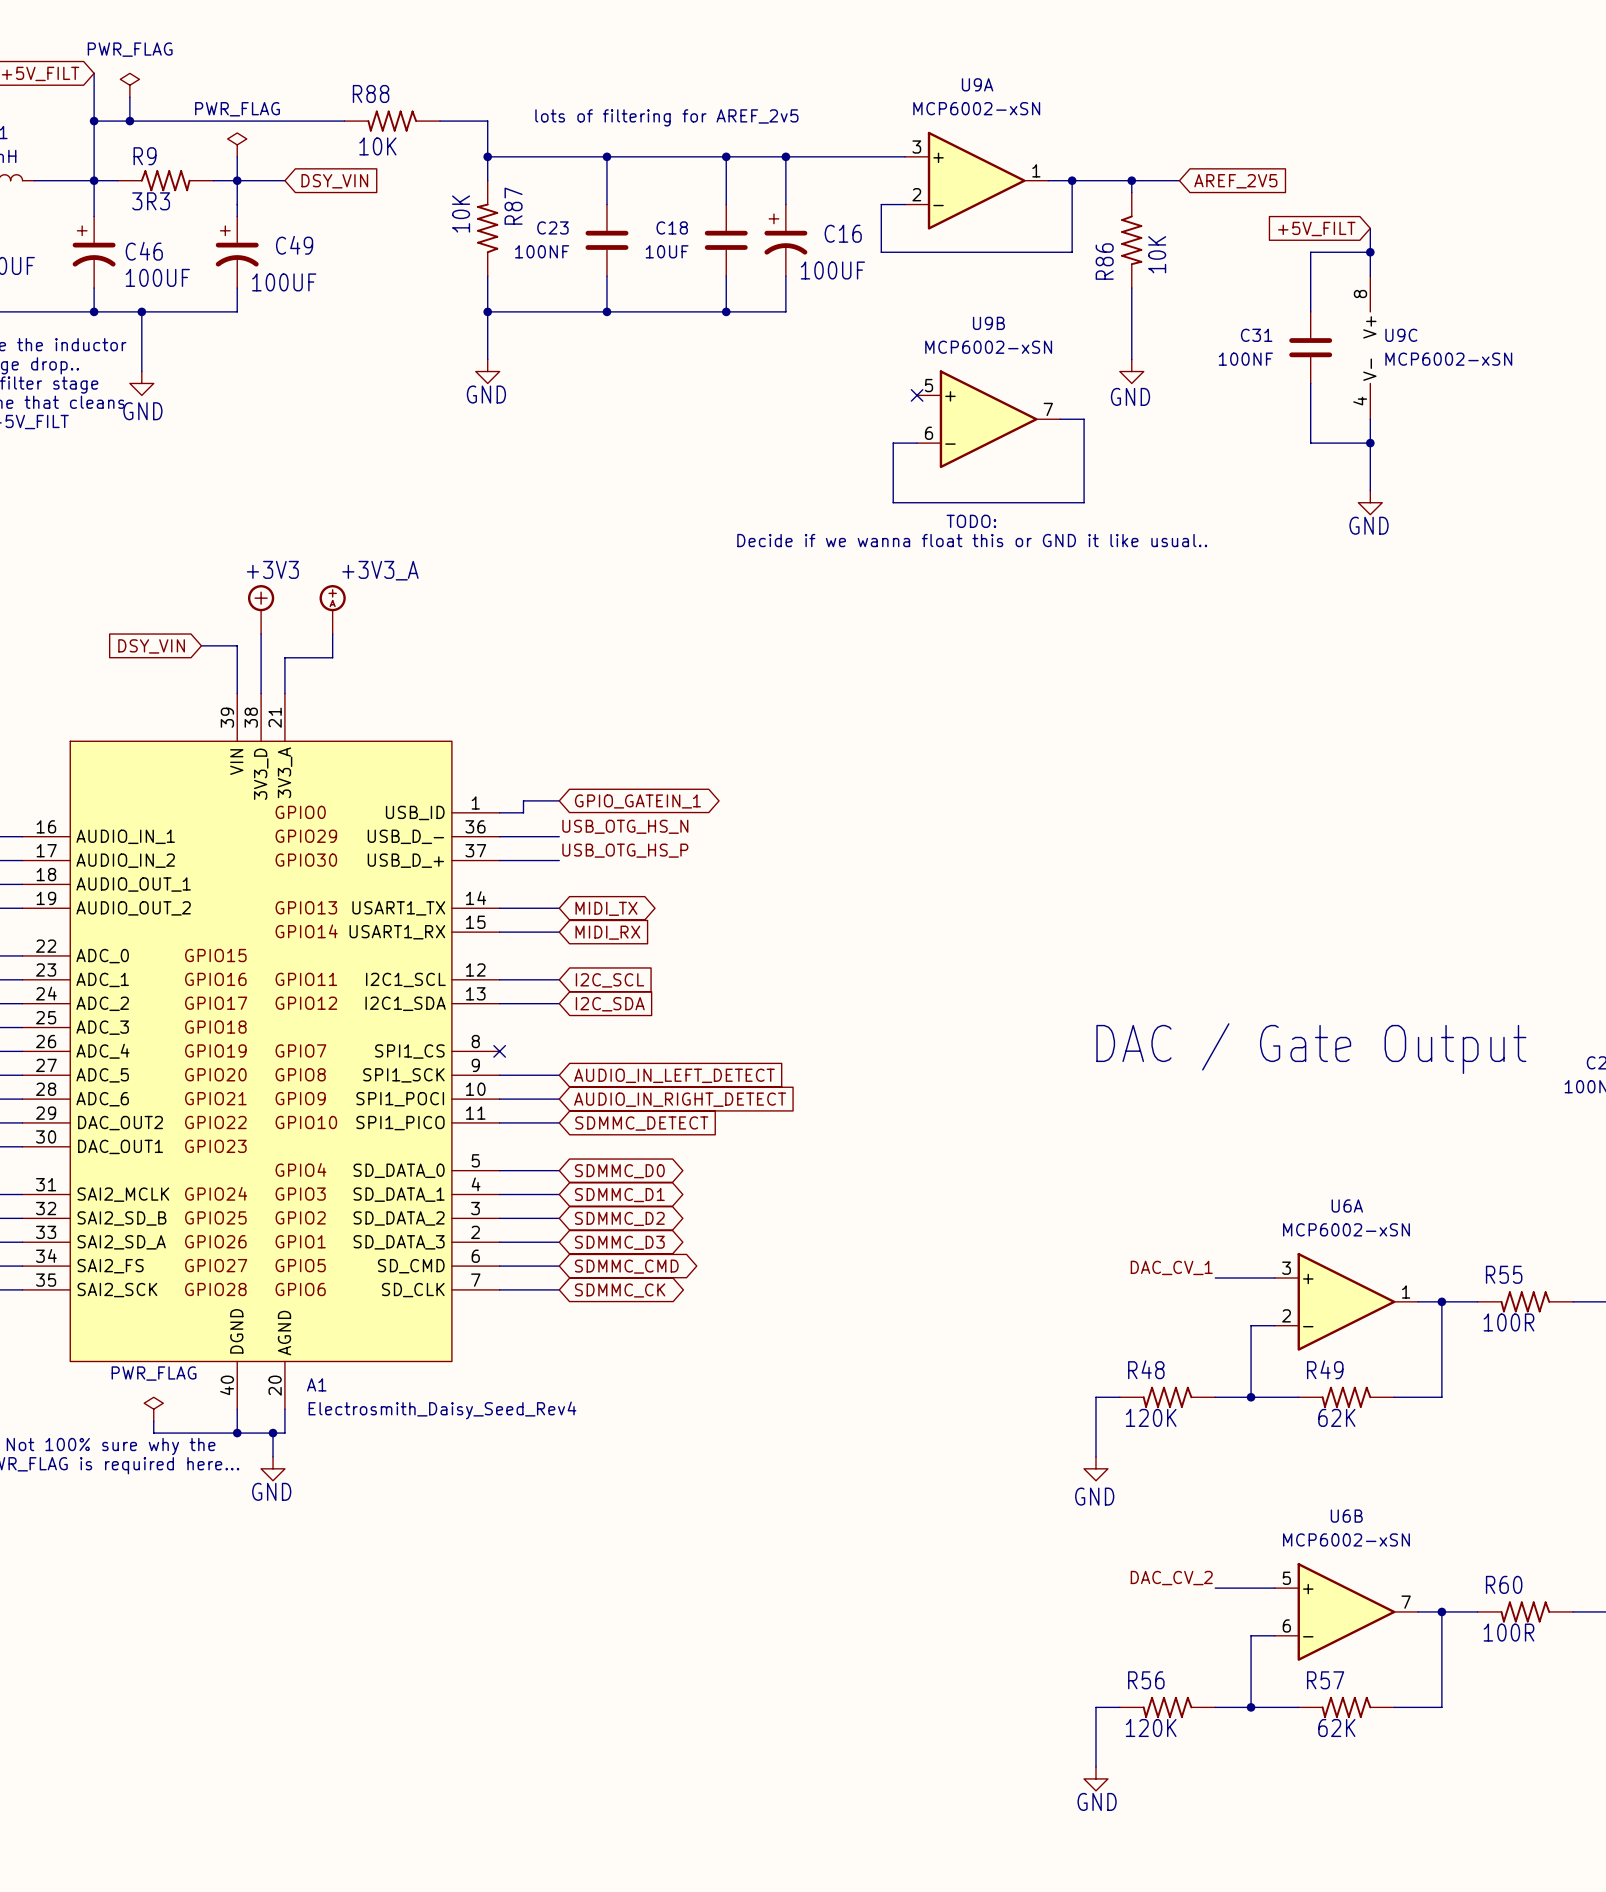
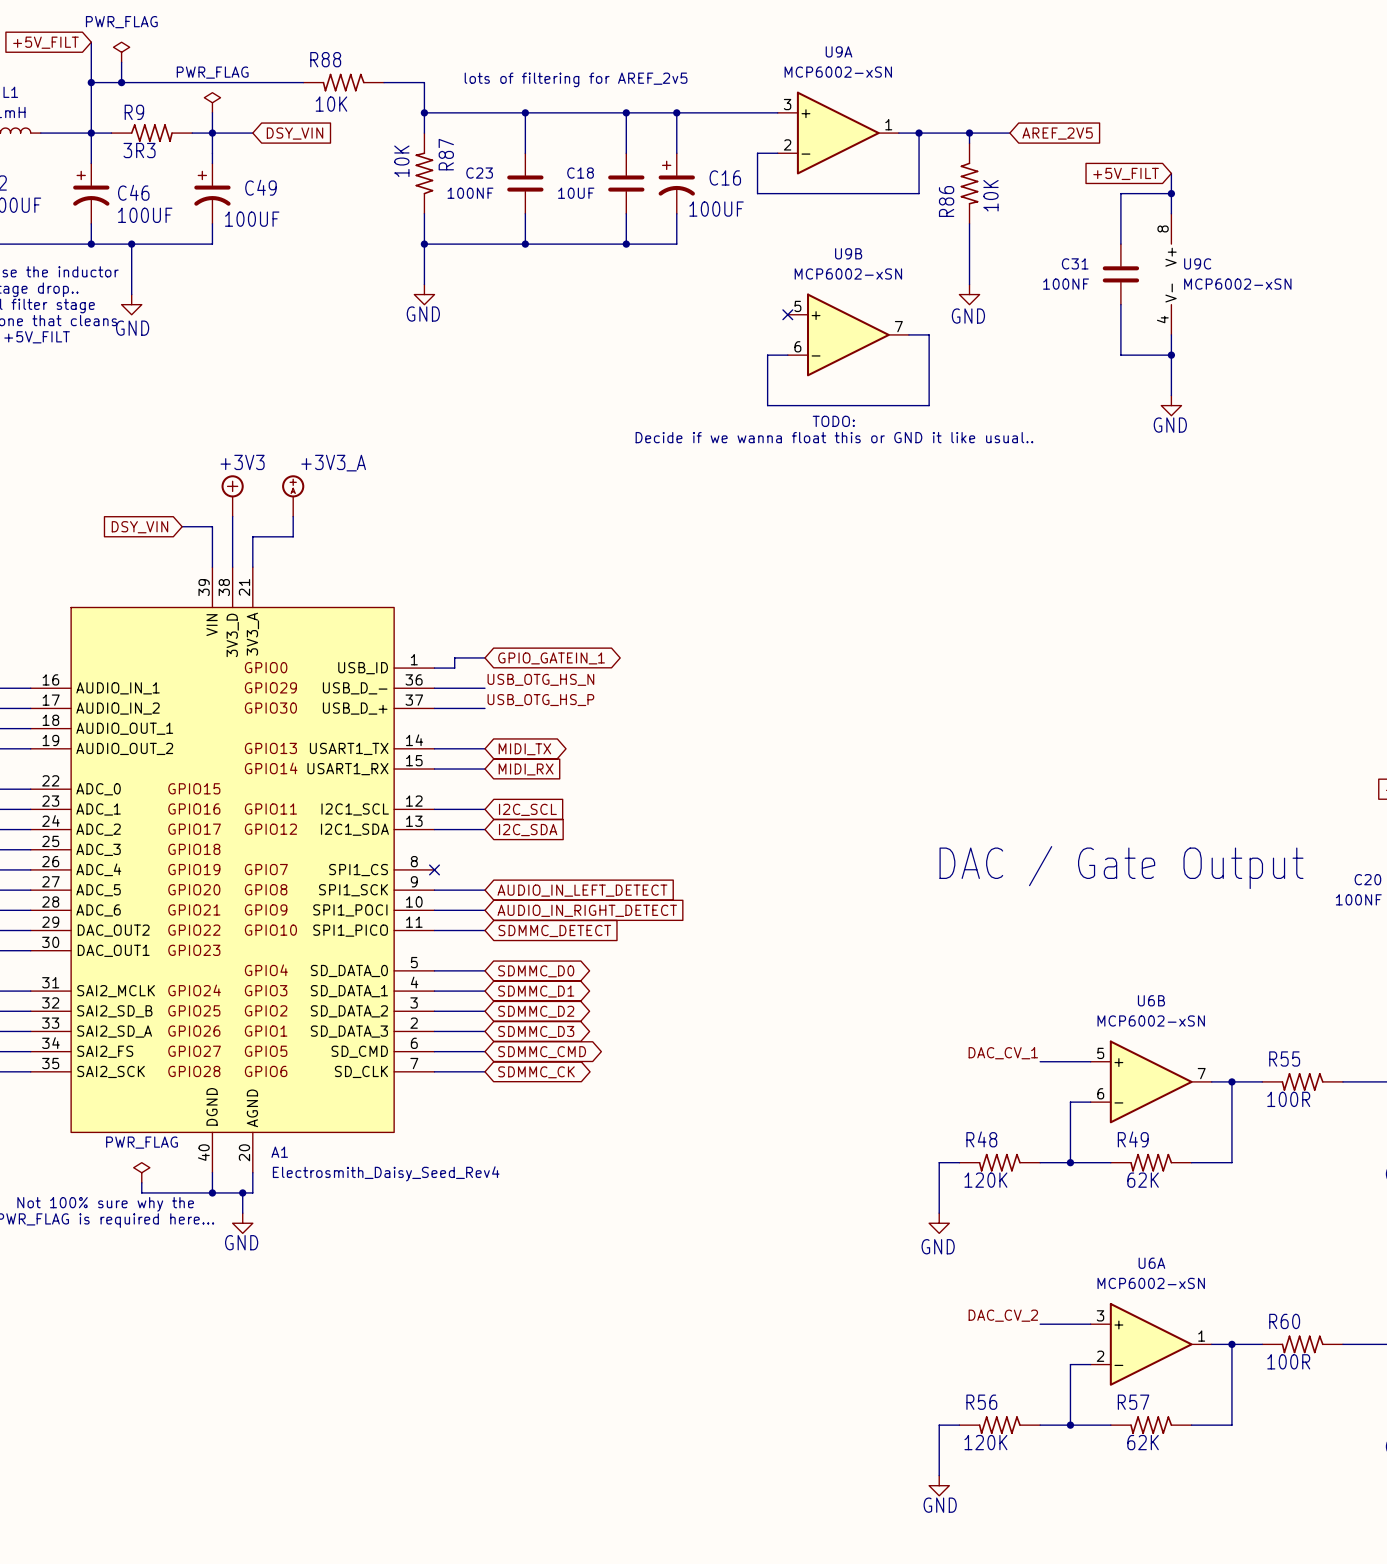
U6A position: (1346, 1301) -> (1151, 1344)
U6B position: (1346, 1611) -> (1151, 1081)

